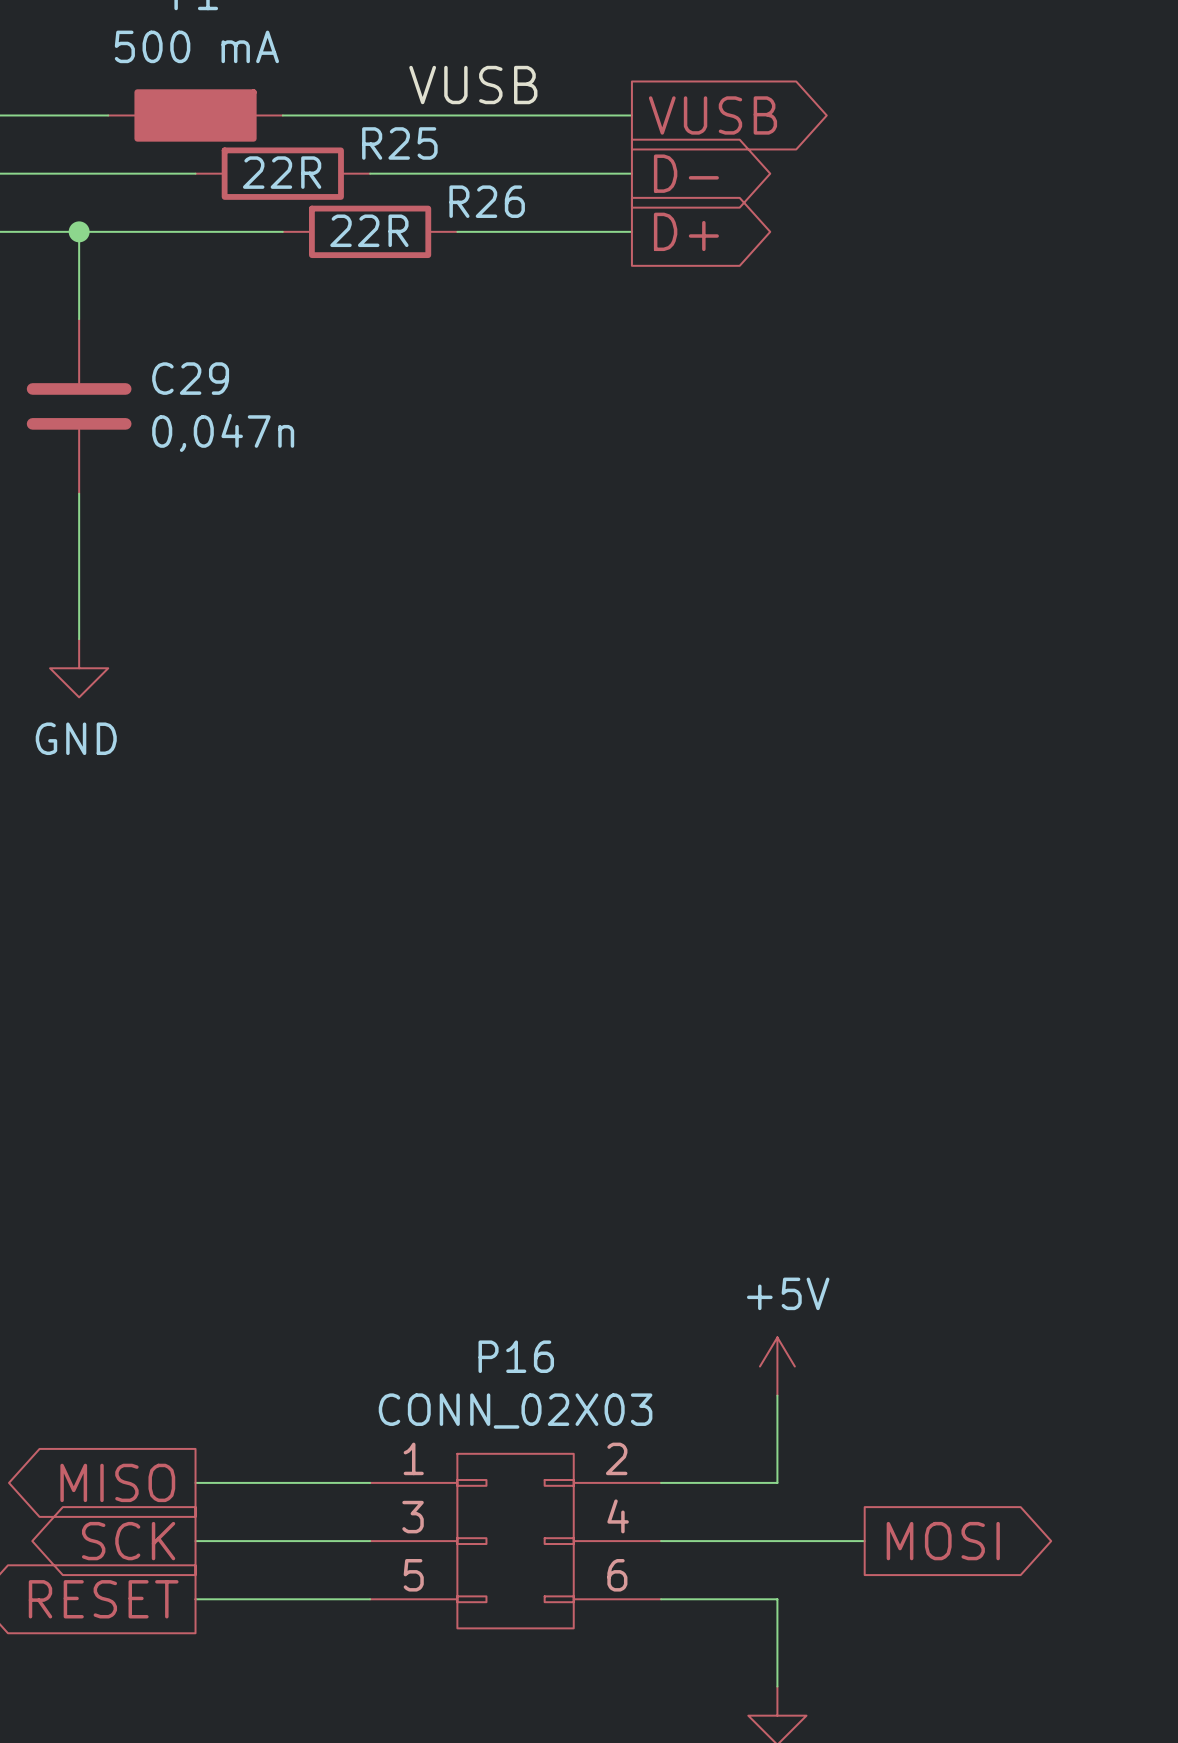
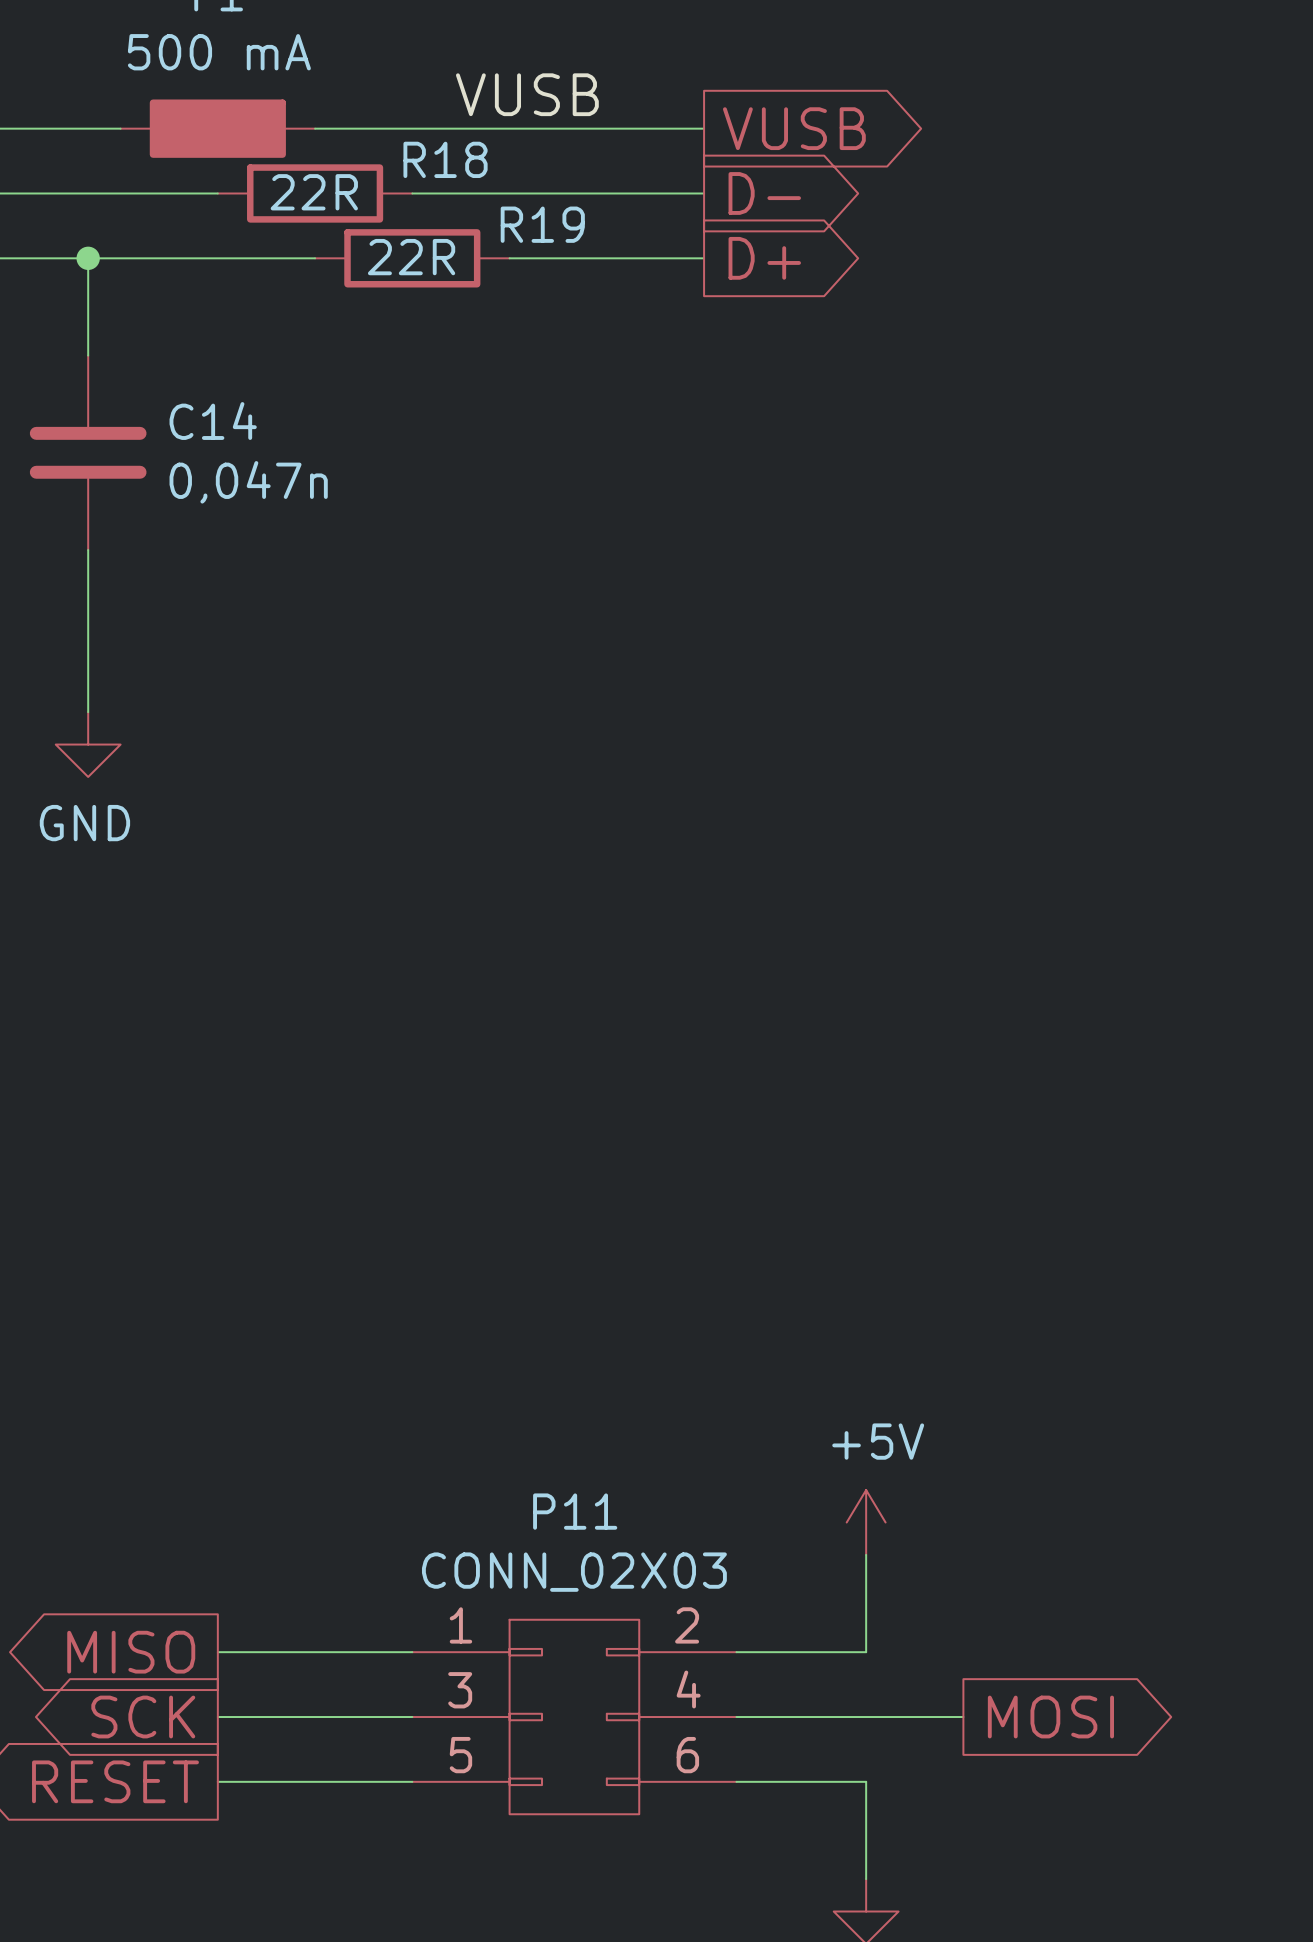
R25 name: R25 (399, 143) -> R18 (445, 159)
R26 name: R26 (487, 201) -> R19 (542, 224)
C29 name: C29 (190, 378) -> C14 (213, 421)
P16 name: P16 (516, 1356) -> P11 (575, 1511)

